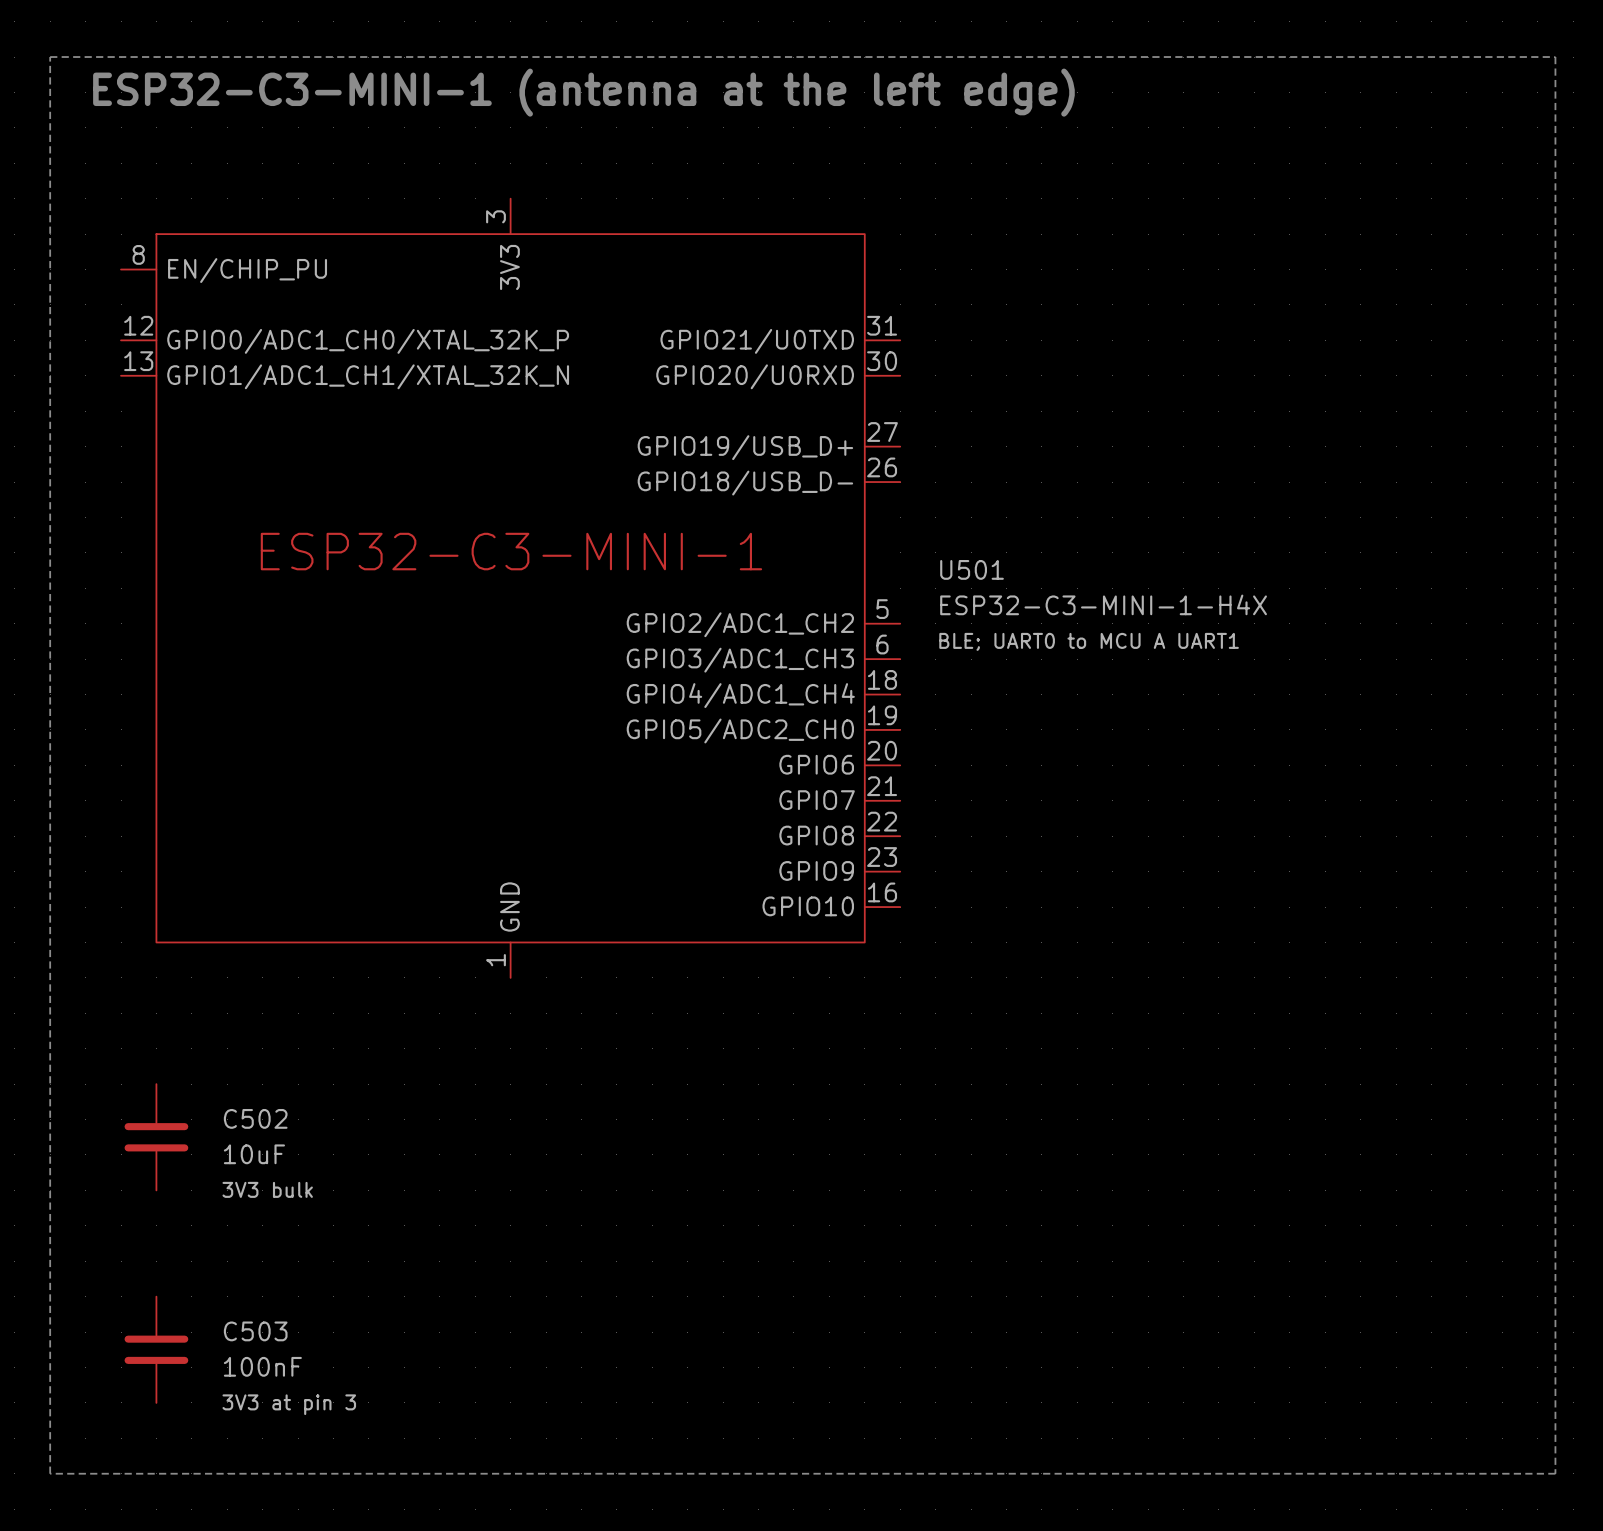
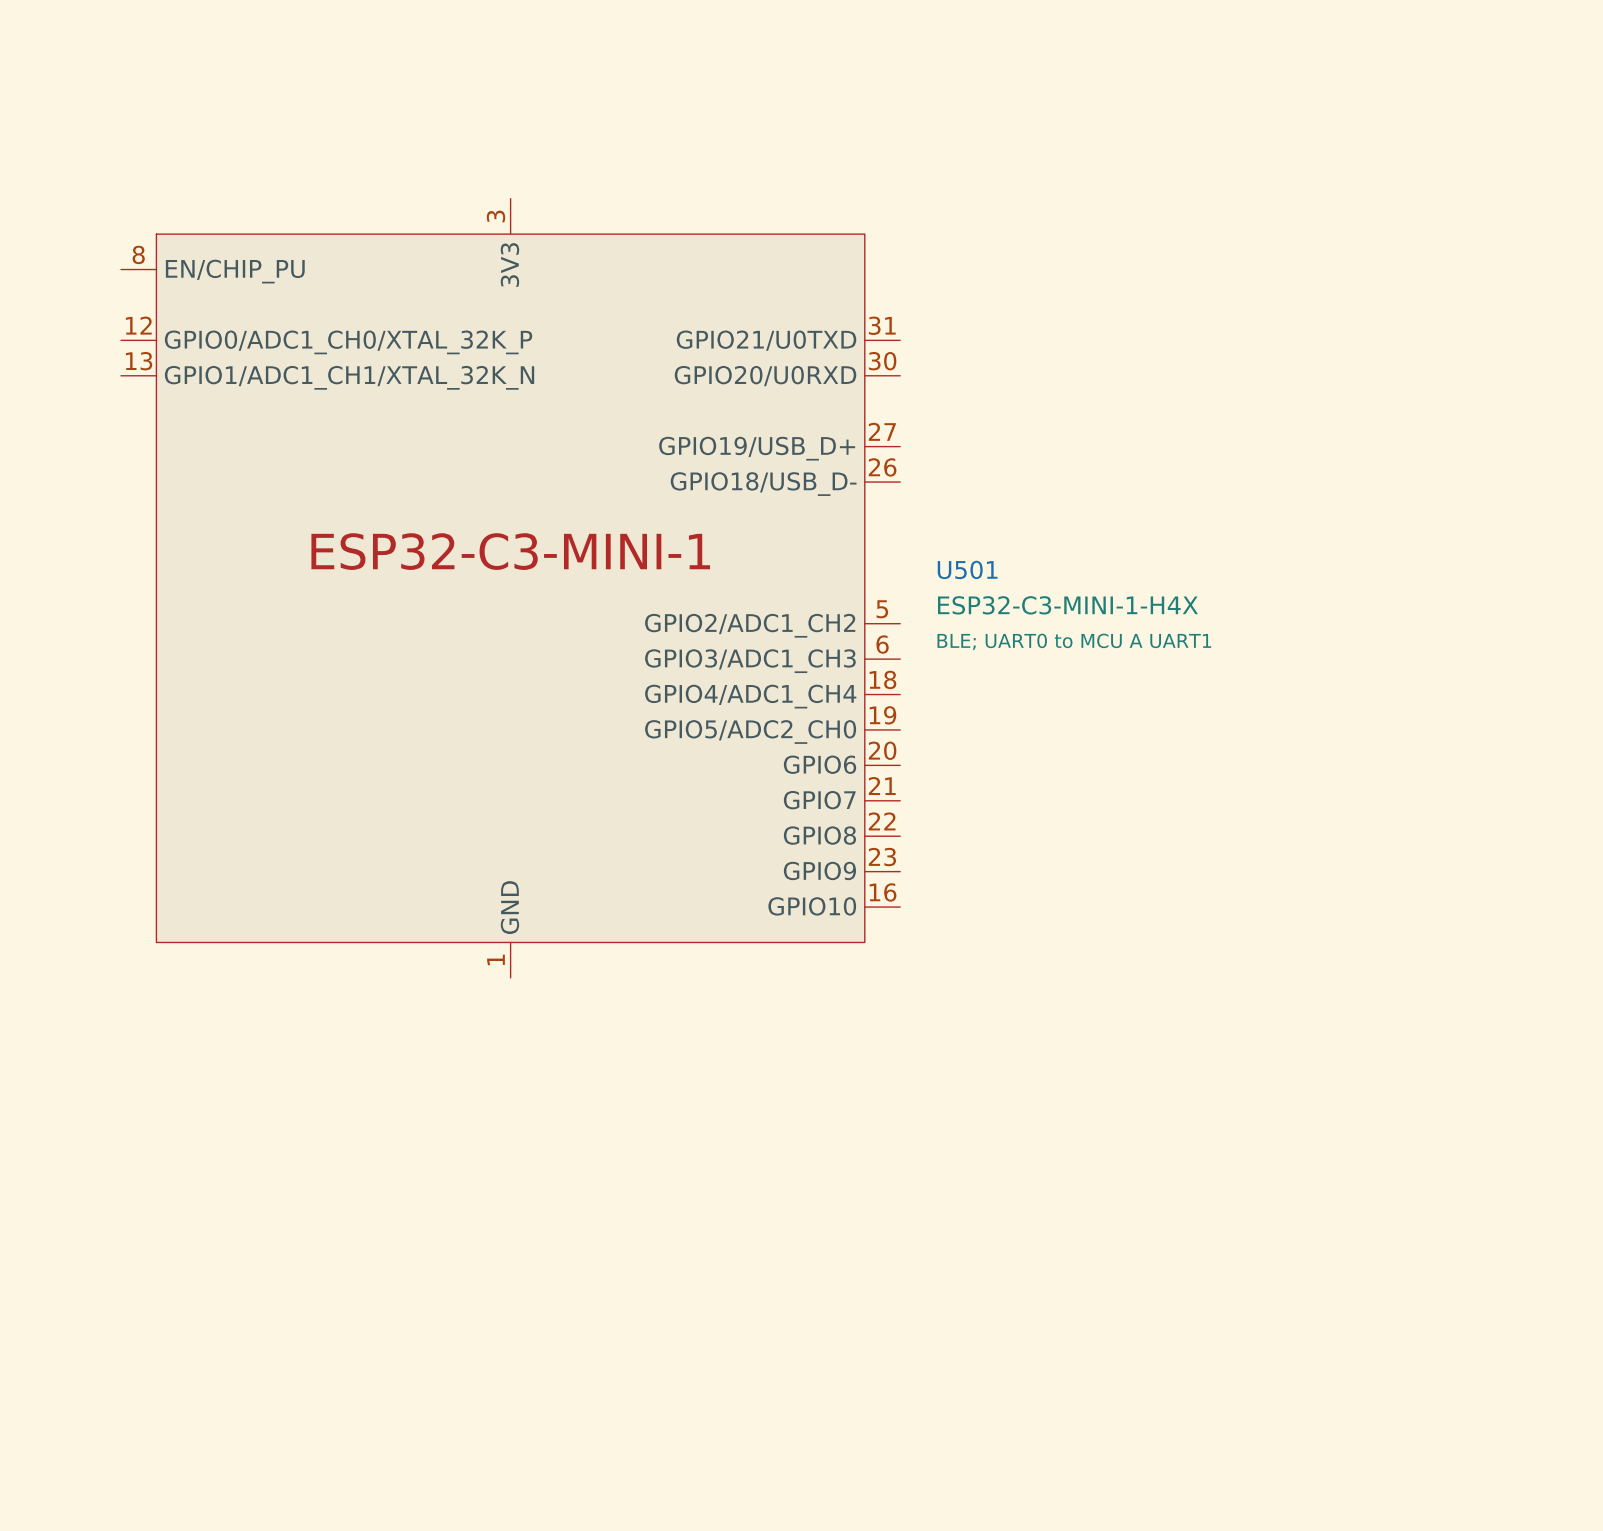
line: (50, 57) (1555, 57) (1555, 1473) (50, 1473) (50, 57) -> none
text: ESP32-C3-MINI-1 (antenna at the left edge) (583, 92) -> none
C502: 10uF (156, 1137) -> none
C503: 100nF (156, 1349) -> none

